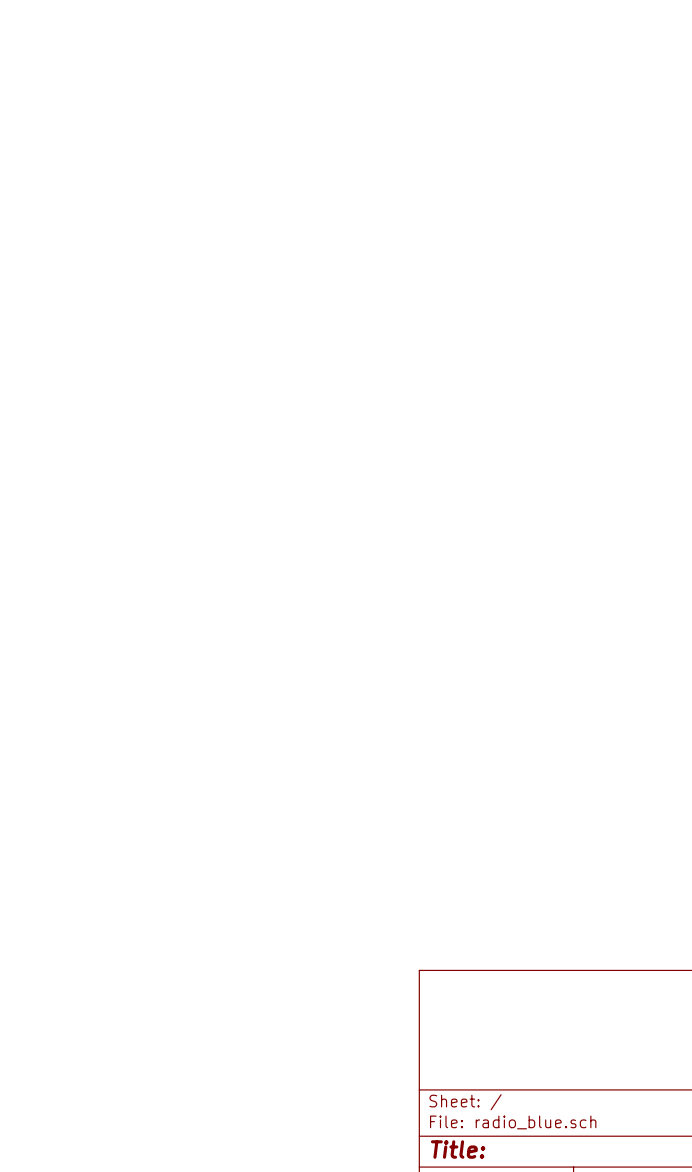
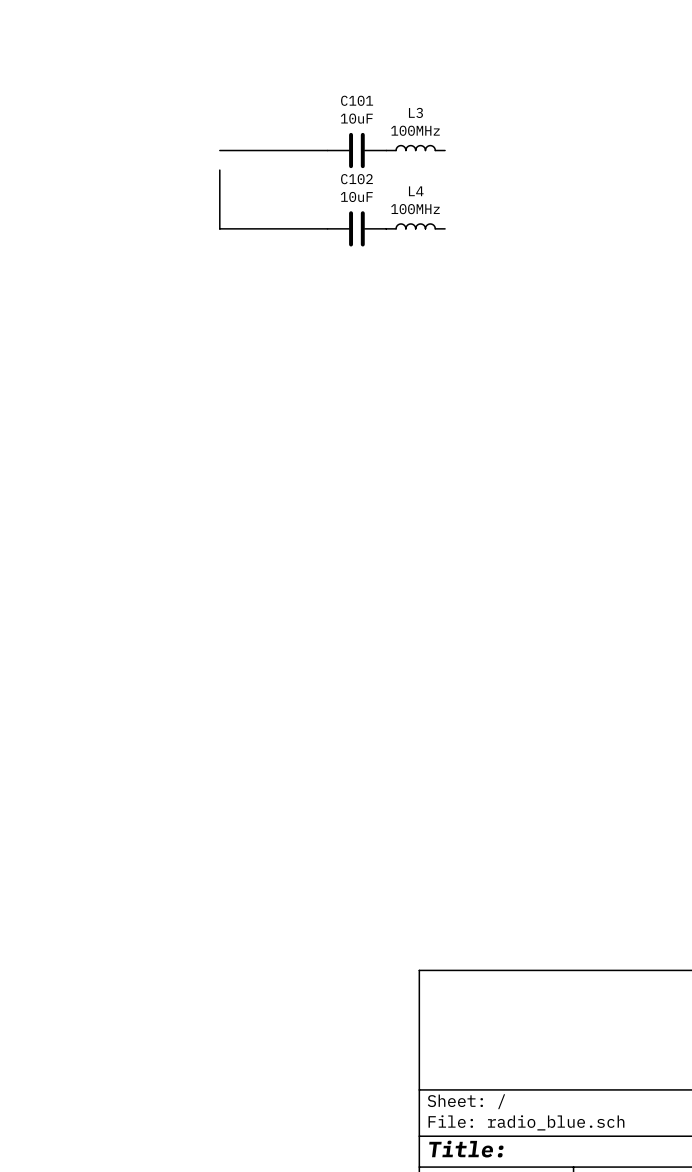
L3: none -> 100MHz (415, 148)
wire: none -> (219, 150) (327, 150)
C101: none -> 10uF (356, 150)
wire: none -> (219, 170) (219, 228) (327, 228)
L4: none -> 100MHz (415, 226)
C102: none -> 10uF (356, 228)

